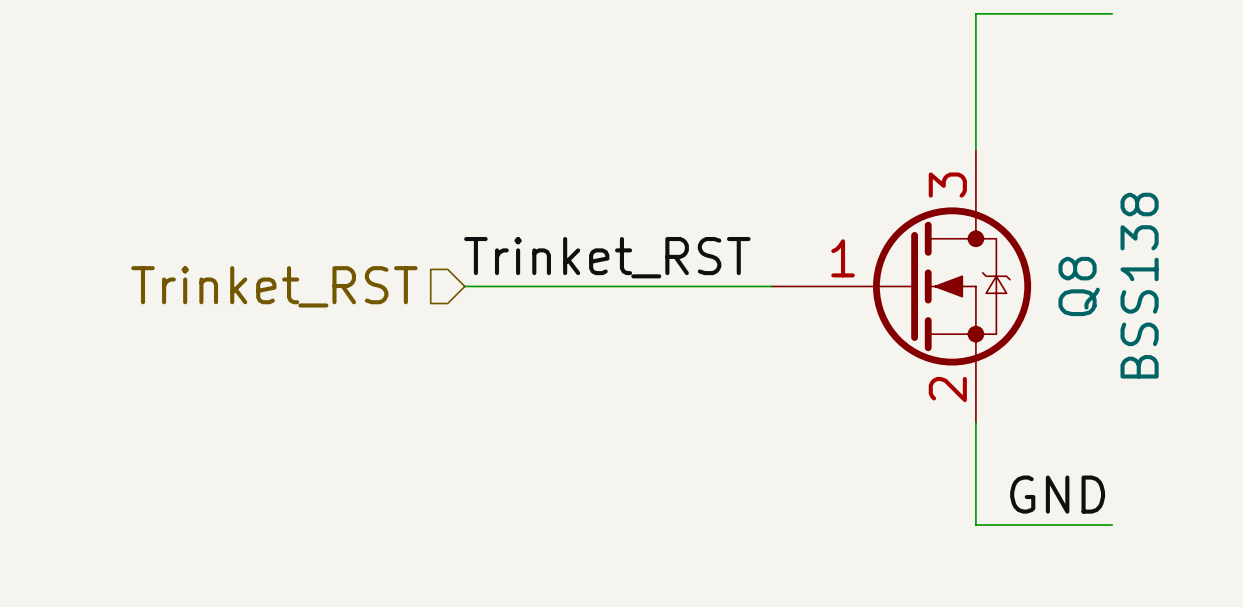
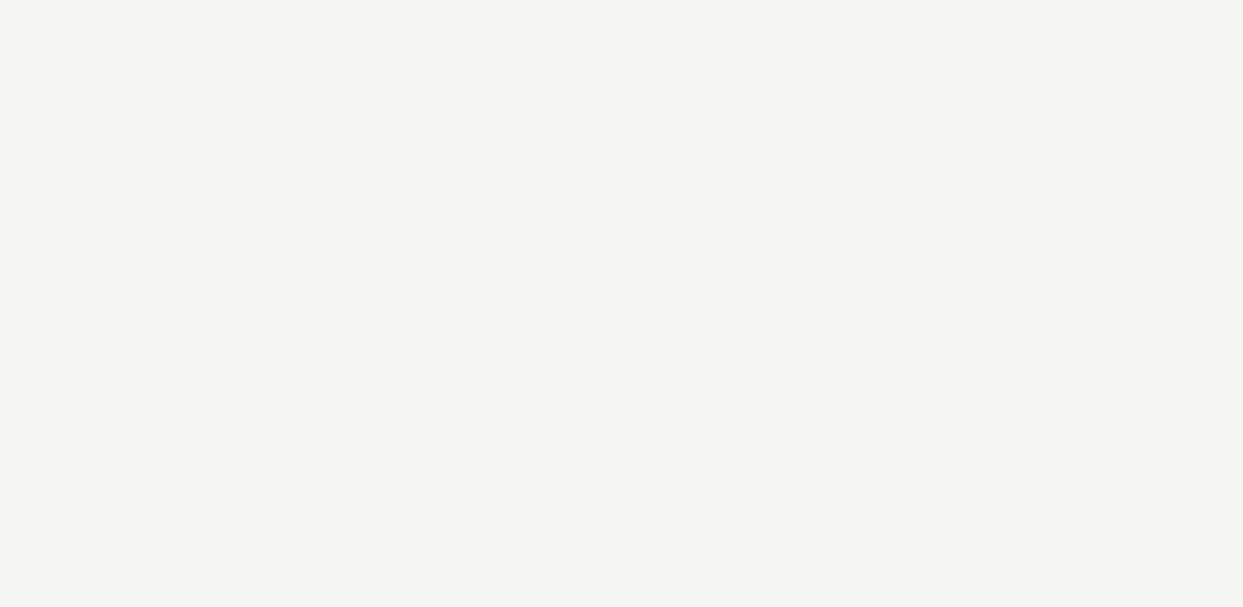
wire: (1112, 13) (975, 13) (975, 150) -> none
label: Trinket_RST (607, 257) -> none
hierarchical label: Trinket_RST (274, 286) -> none
wire: (464, 286) (771, 286) -> none
Q8: BSS138 (901, 286) -> none
wire: (975, 422) (975, 524) (1112, 524) -> none
label: GND (1057, 494) -> none

